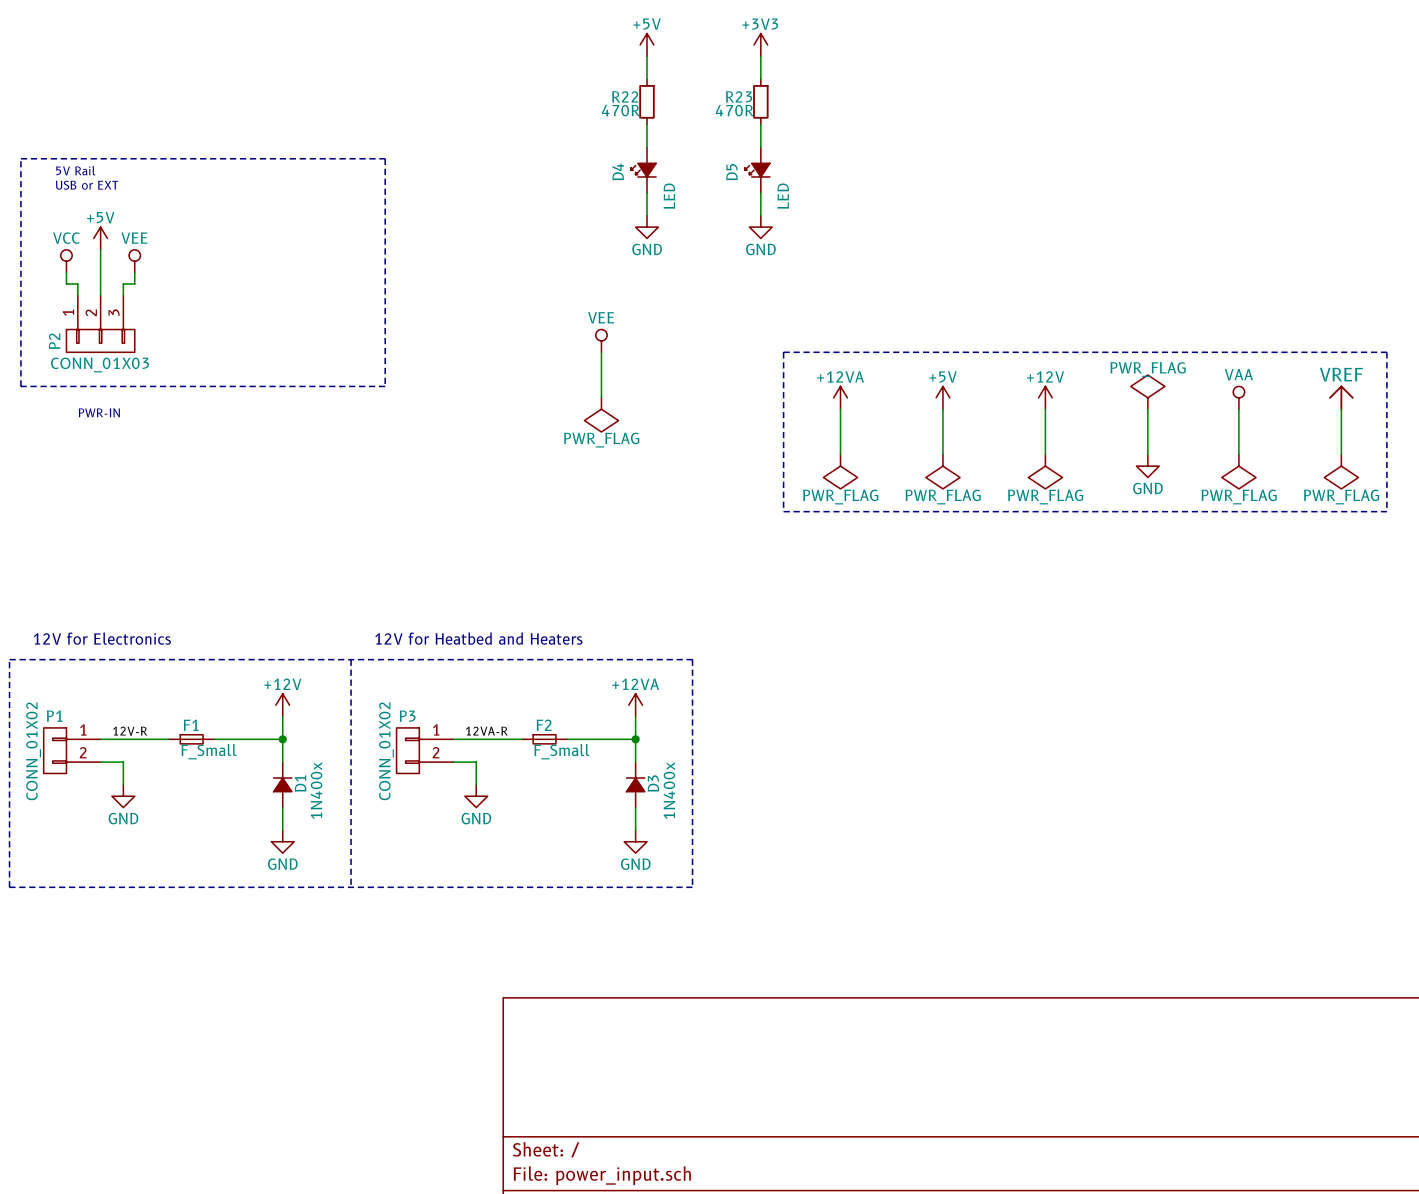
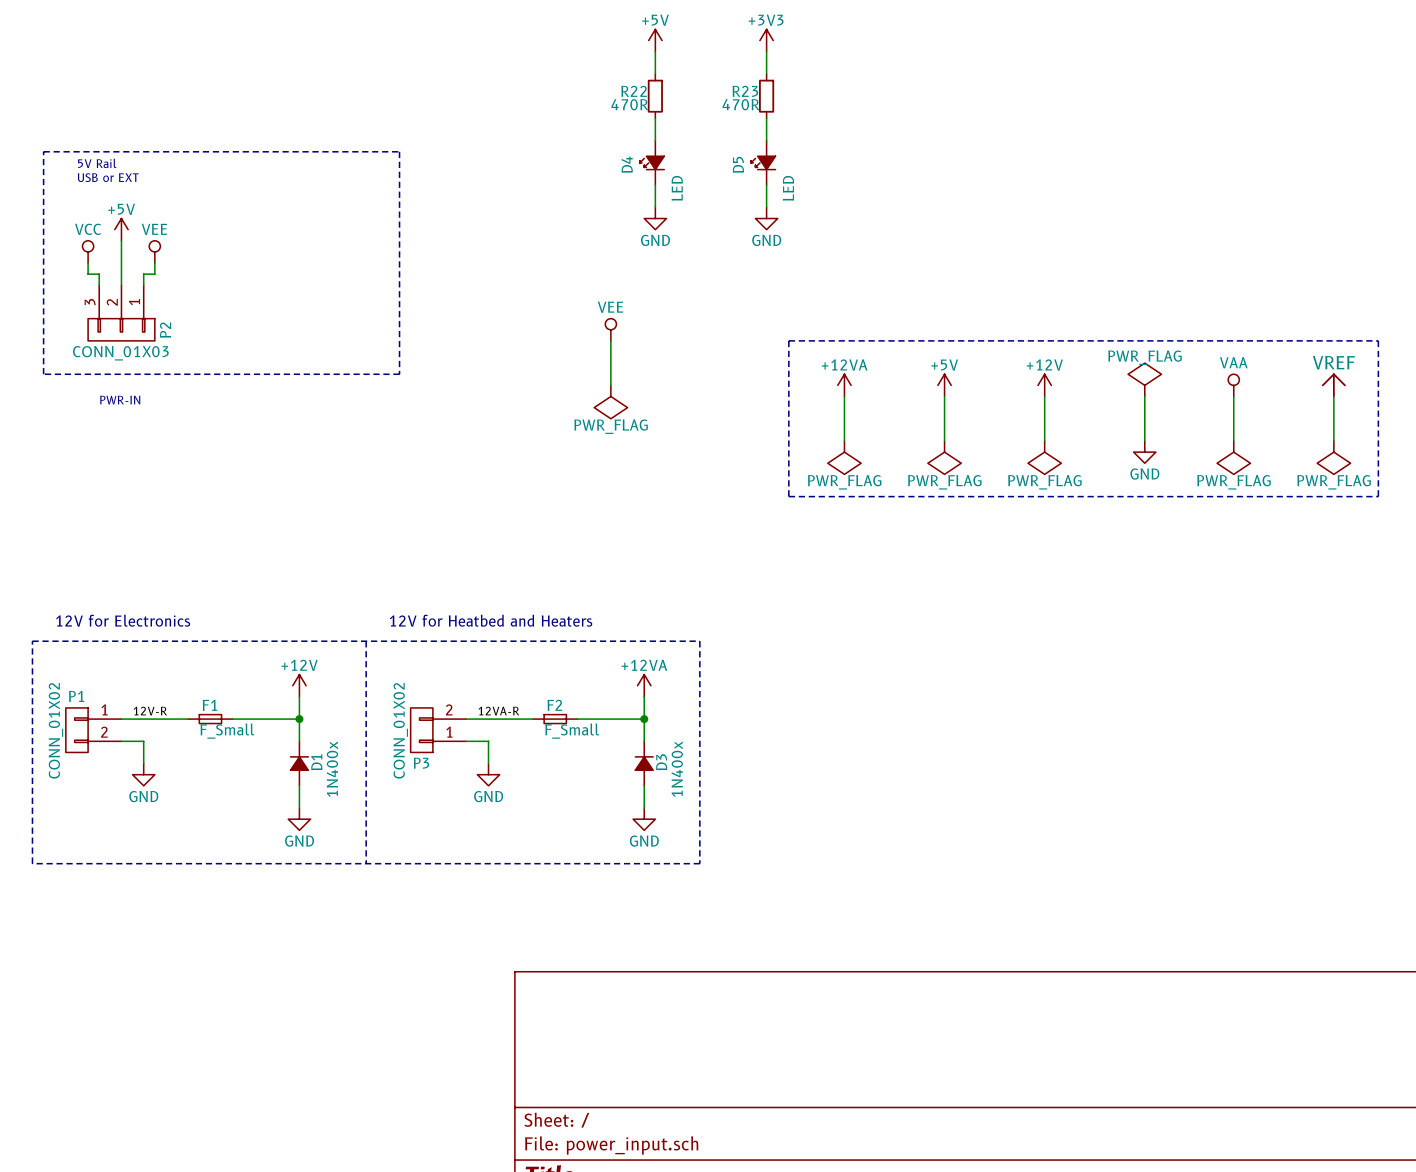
P2 flip: as is (100, 340) -> left-right (121, 329)
P3 flip: as is (407, 750) -> up-down (421, 730)

